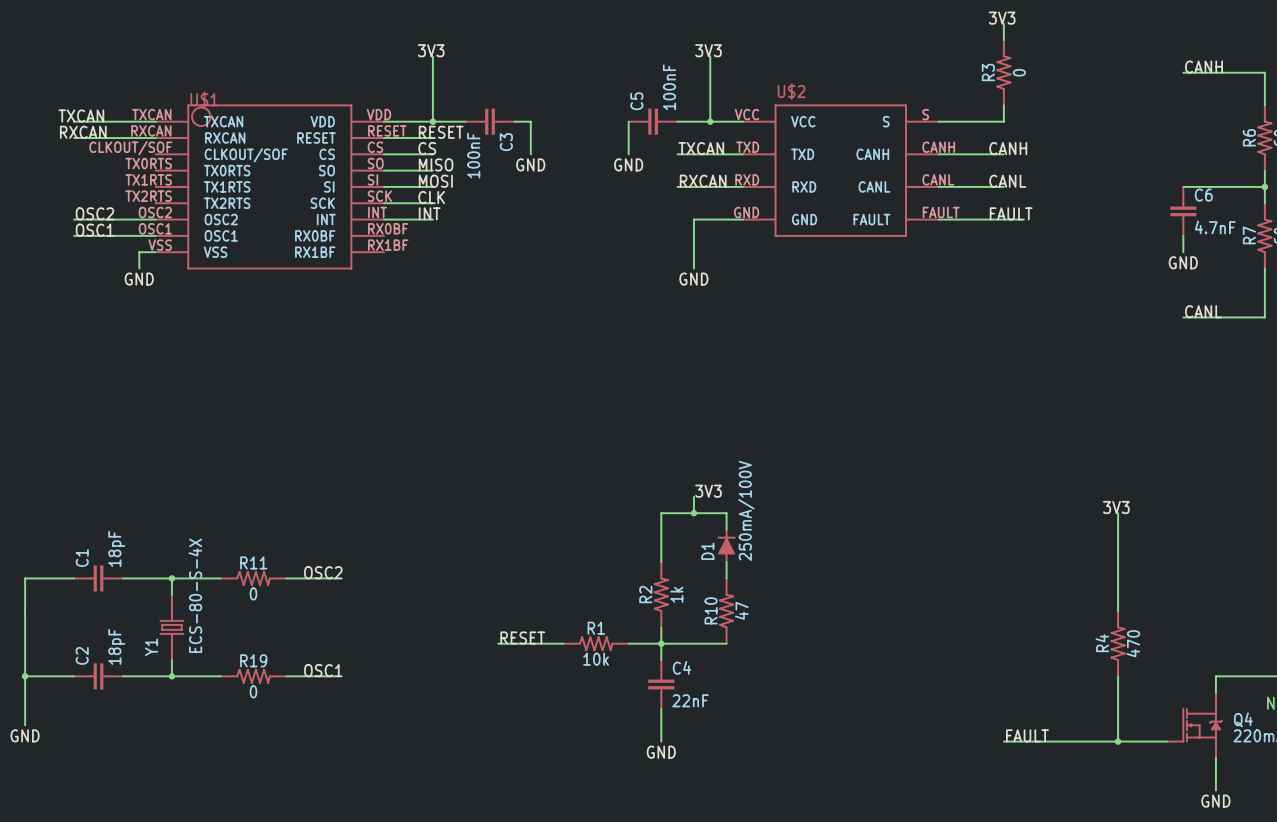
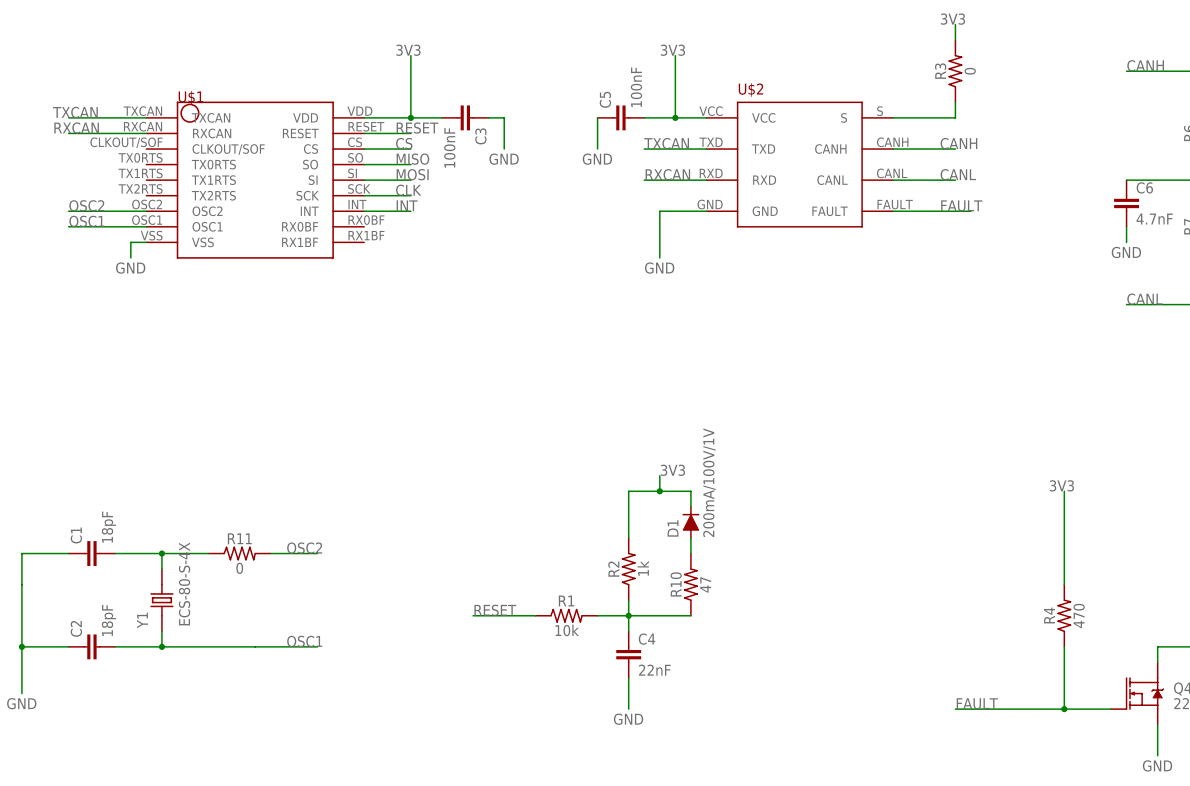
D1 value: 250mA/100V (746, 510) -> 200mA/100V/1V (709, 482)
R19: 0 (253, 676) -> none

